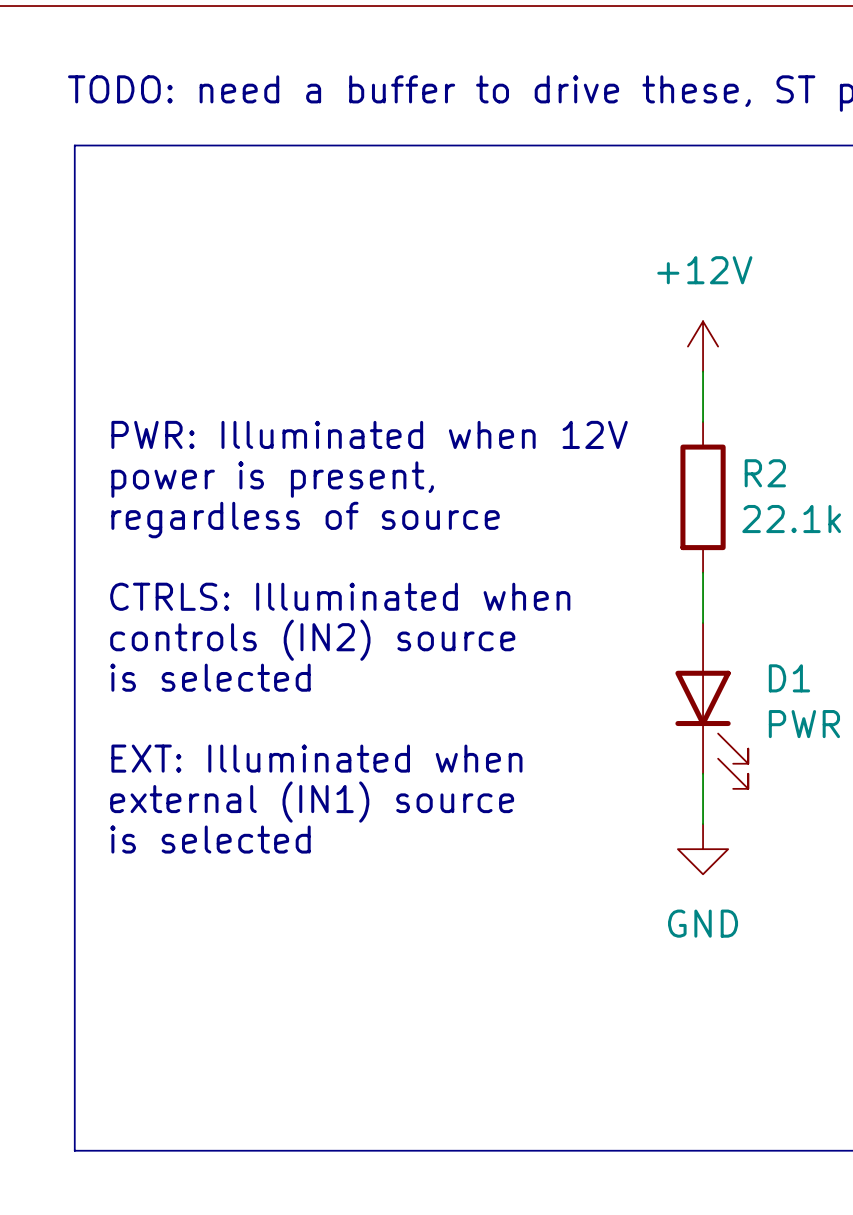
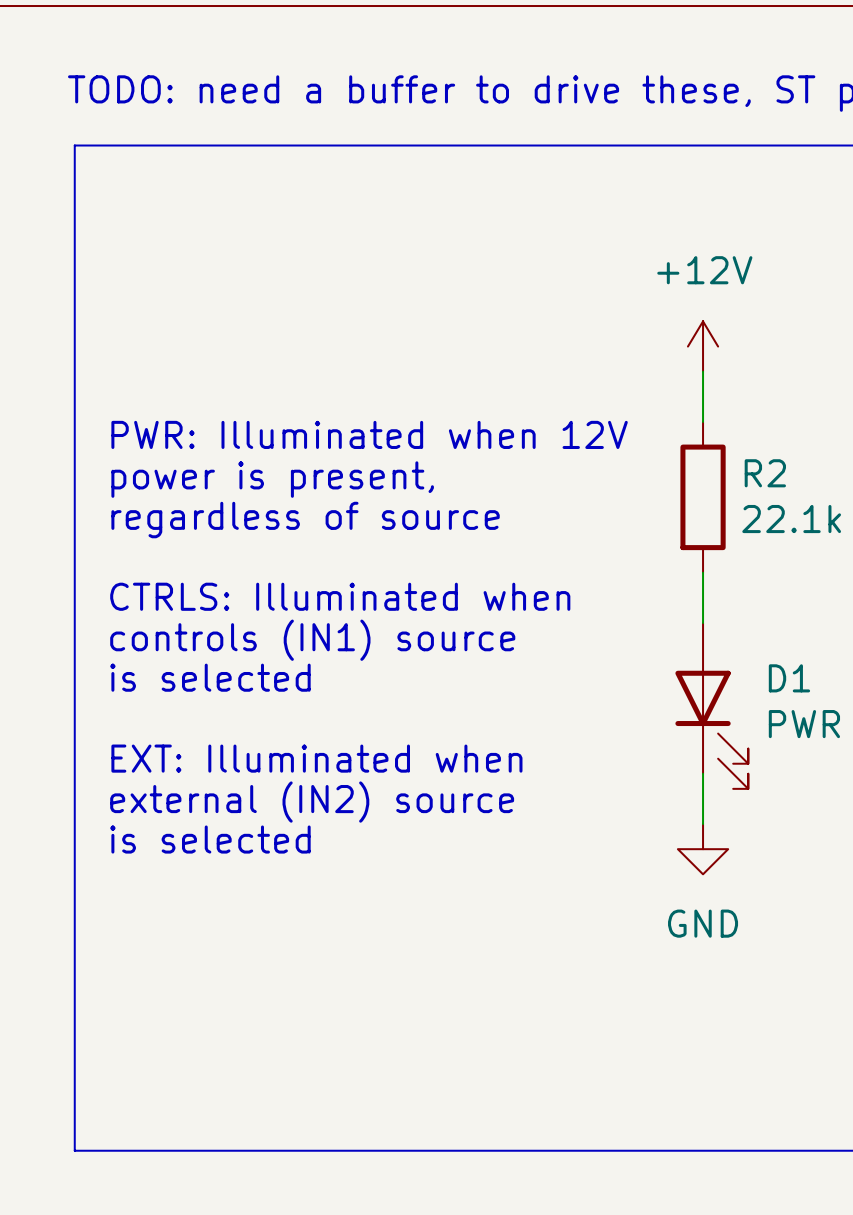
text: controls (IN2) source (312, 640) -> controls (IN1) source (312, 640)
text: external (IN1) source (312, 802) -> external (IN2) source (312, 802)

